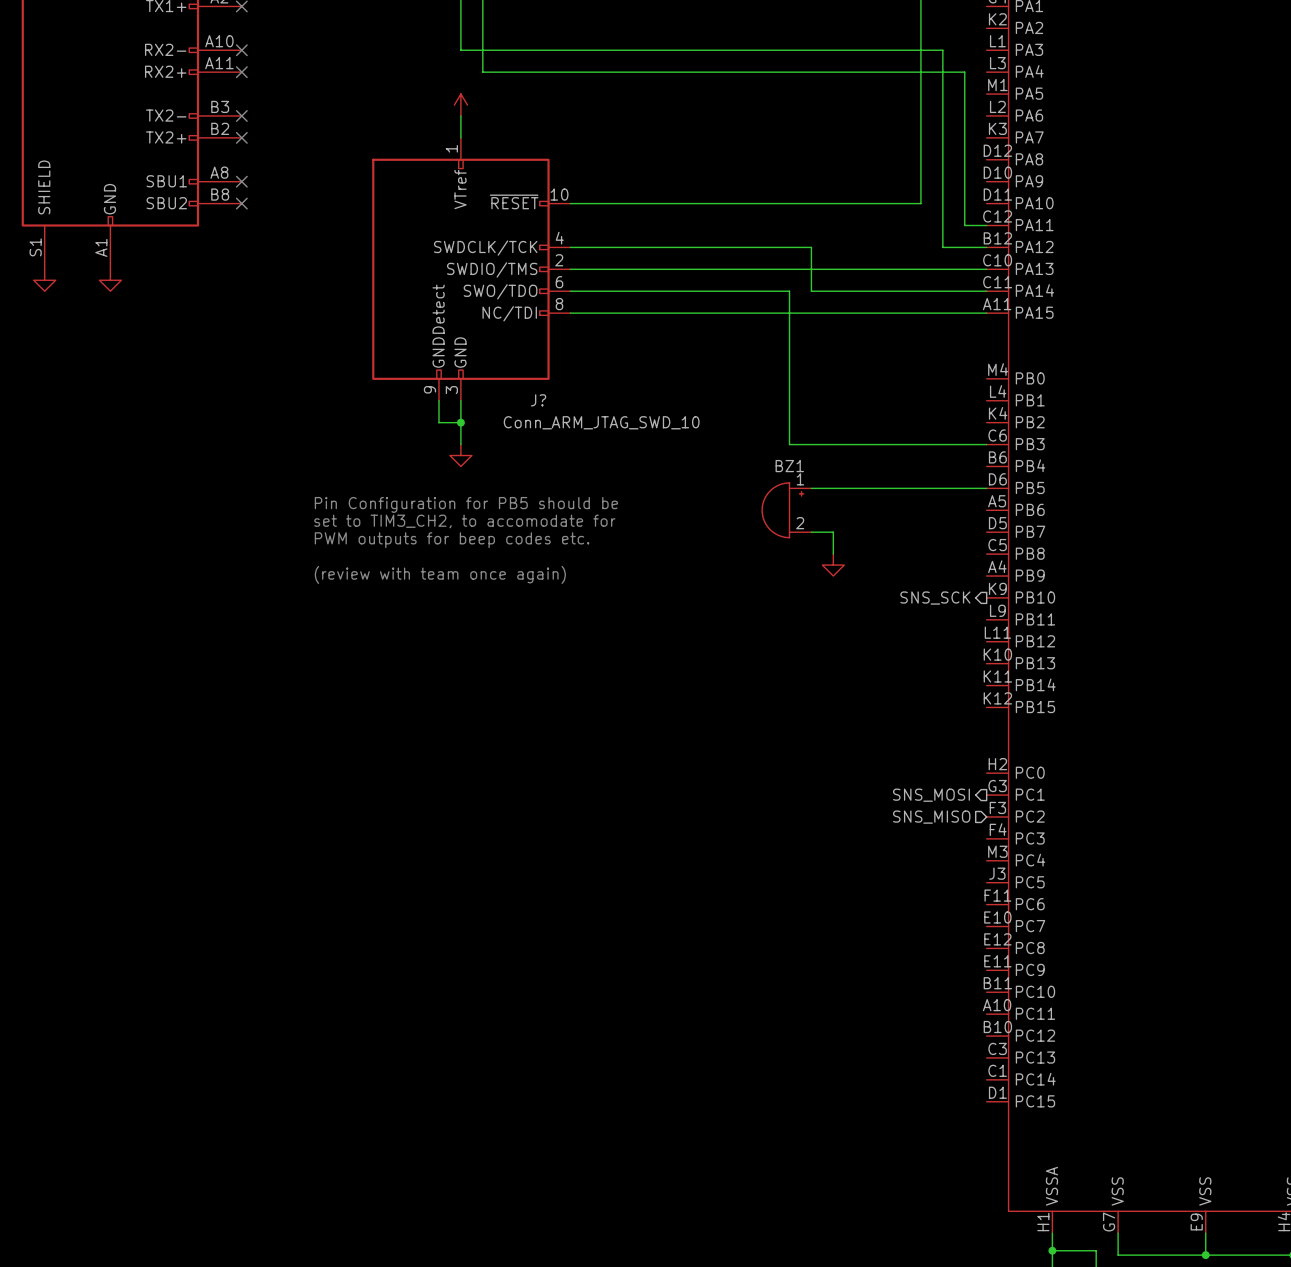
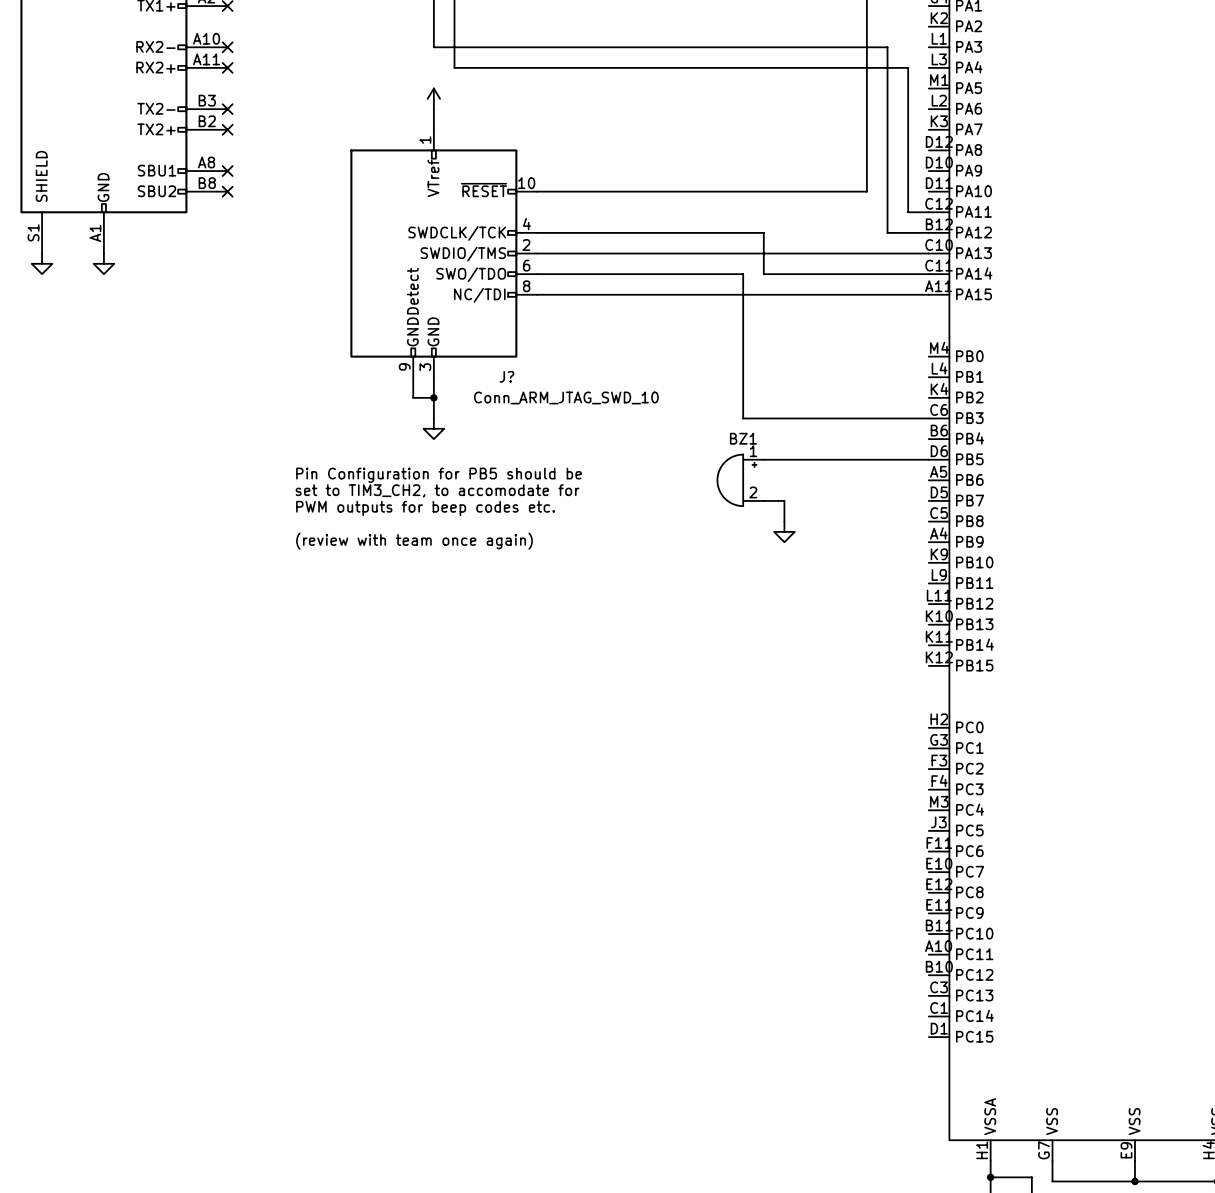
hierarchical label: SNS_SCK (935, 598) -> none
hierarchical label: SNS_MOSI (931, 795) -> none
hierarchical label: SNS_MISO (931, 817) -> none

